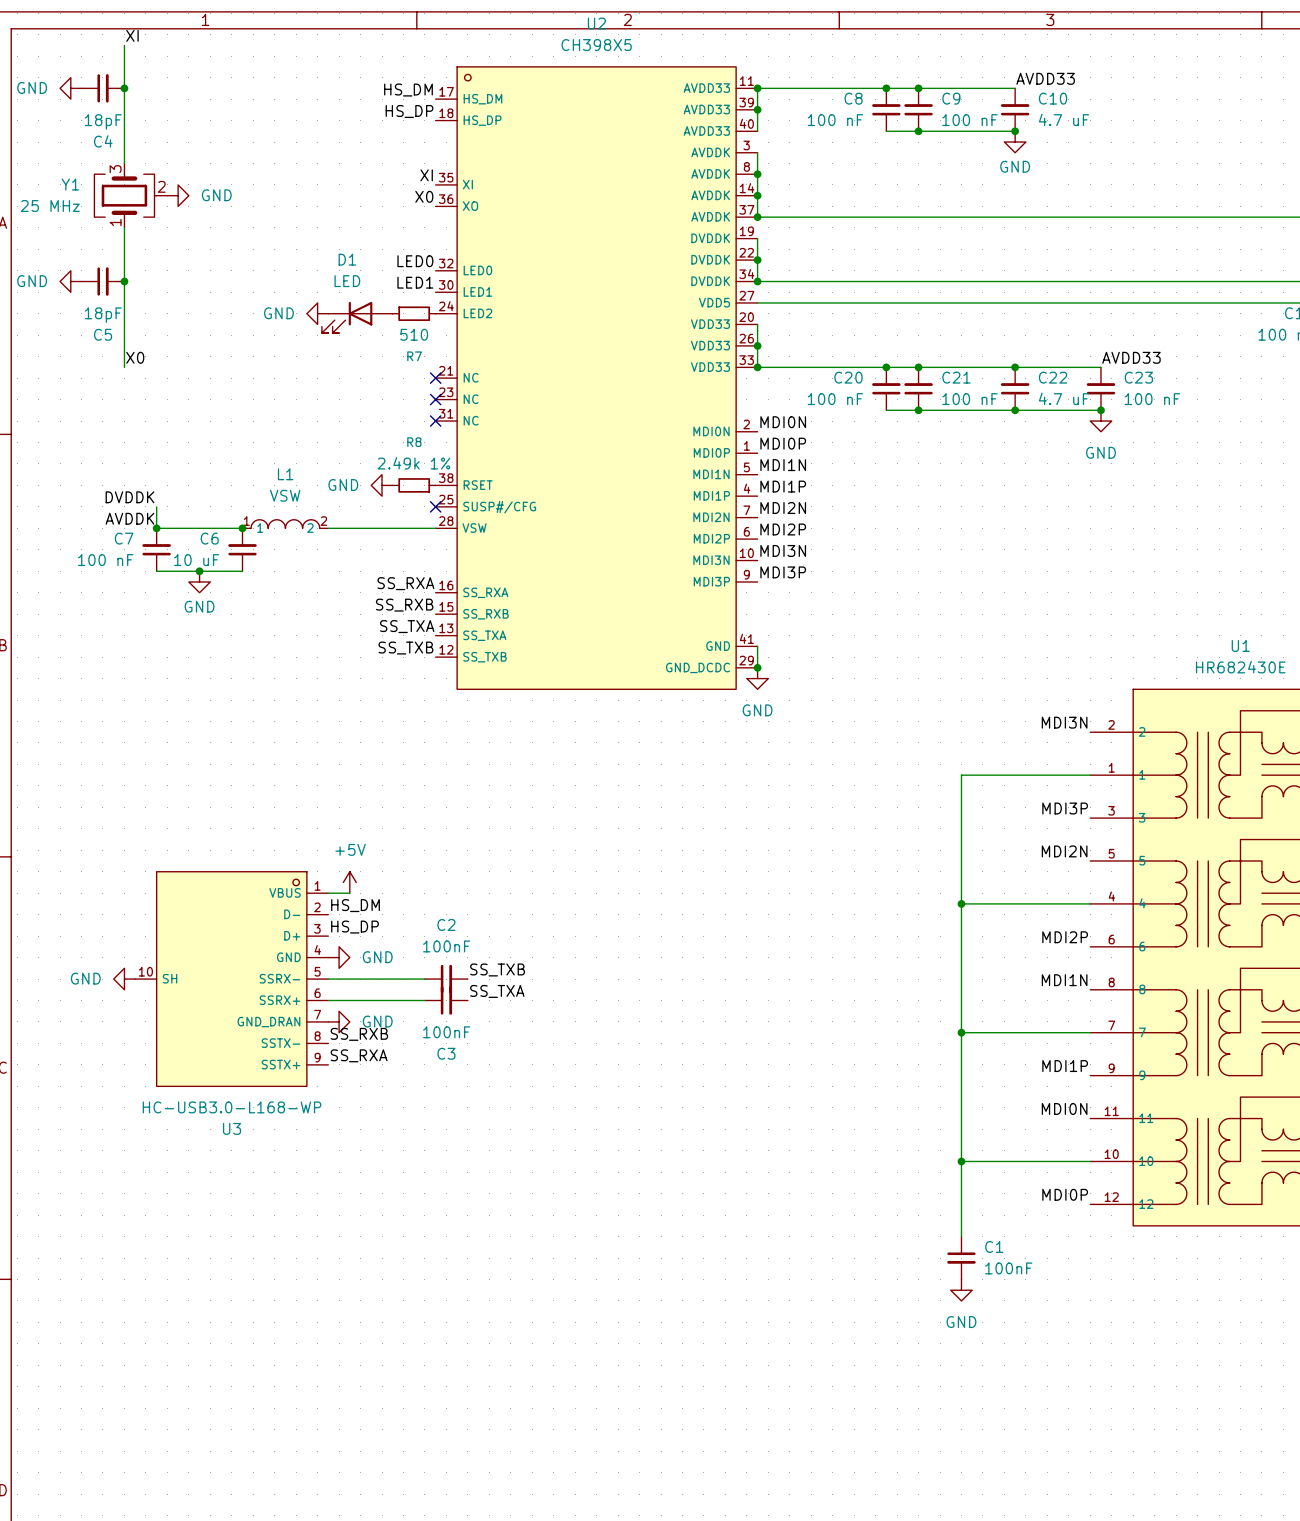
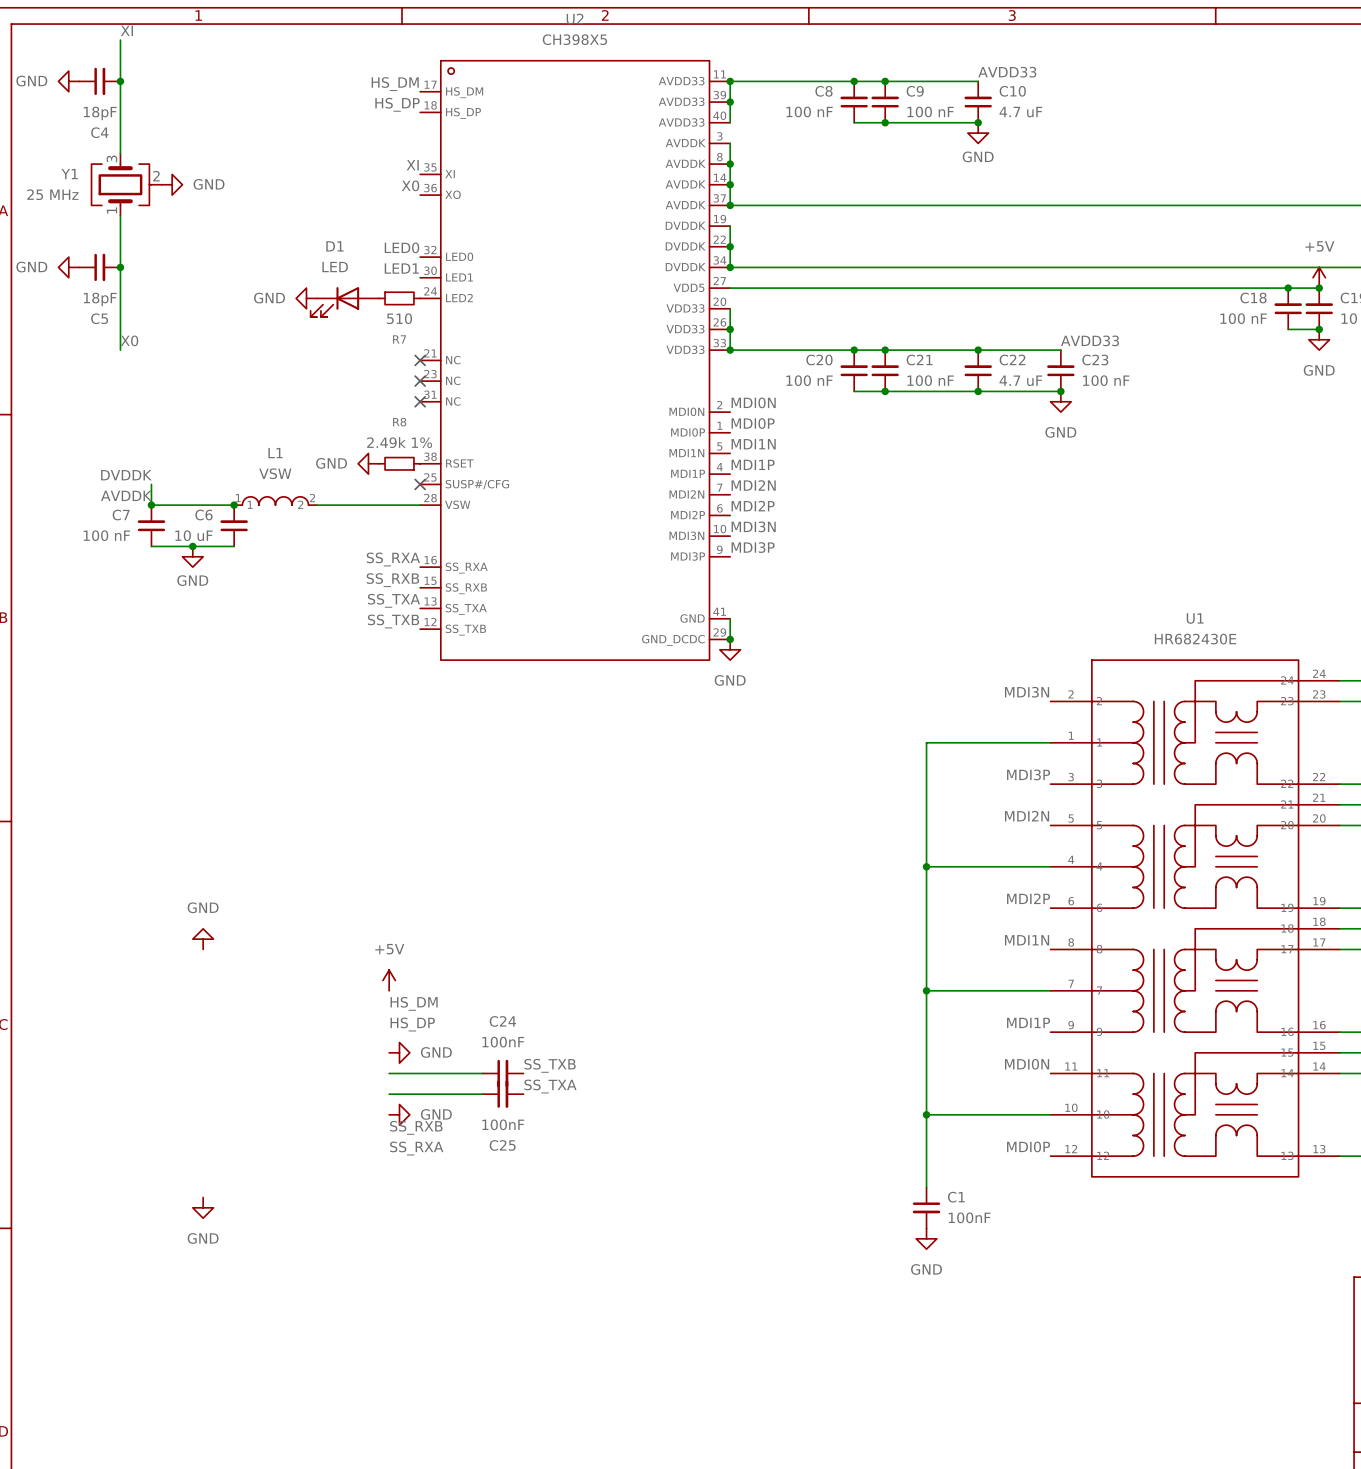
power symbol position: +5V (349, 882) -> +5V (389, 980)
wire: (328, 893) (349, 893) -> none
label position: HS_DM (355, 905) -> HS_DM (414, 1003)
label position: HS_DP (354, 927) -> HS_DP (412, 1024)
power symbol: GND (339, 957) -> none
label position: SS_TXB (497, 969) -> SS_TXB (550, 1065)
power symbol: GND (124, 979) -> none
power symbol: none -> GND (203, 939)
U3: HC-USB3.0-L168-WP (231, 979) -> none
wire: (328, 979) (424, 979) -> (389, 1073) (482, 1073)
C2: 100nF (446, 979) -> none
label position: SS_TXA (497, 991) -> SS_TXA (550, 1086)
wire: (328, 1000) (424, 1000) -> (389, 1094) (482, 1094)
C3: 100nF (446, 1000) -> none
power symbol: GND (339, 1021) -> none
label position: SS_RXB (359, 1034) -> SS_RXB (416, 1127)
label position: SS_RXA (359, 1055) -> SS_RXA (416, 1148)
power symbol: none -> GND (399, 1052)
C24: none -> 100nF (502, 1073)
C25: none -> 100nF (502, 1094)
power symbol: none -> GND (399, 1114)
power symbol: none -> GND (203, 1207)

